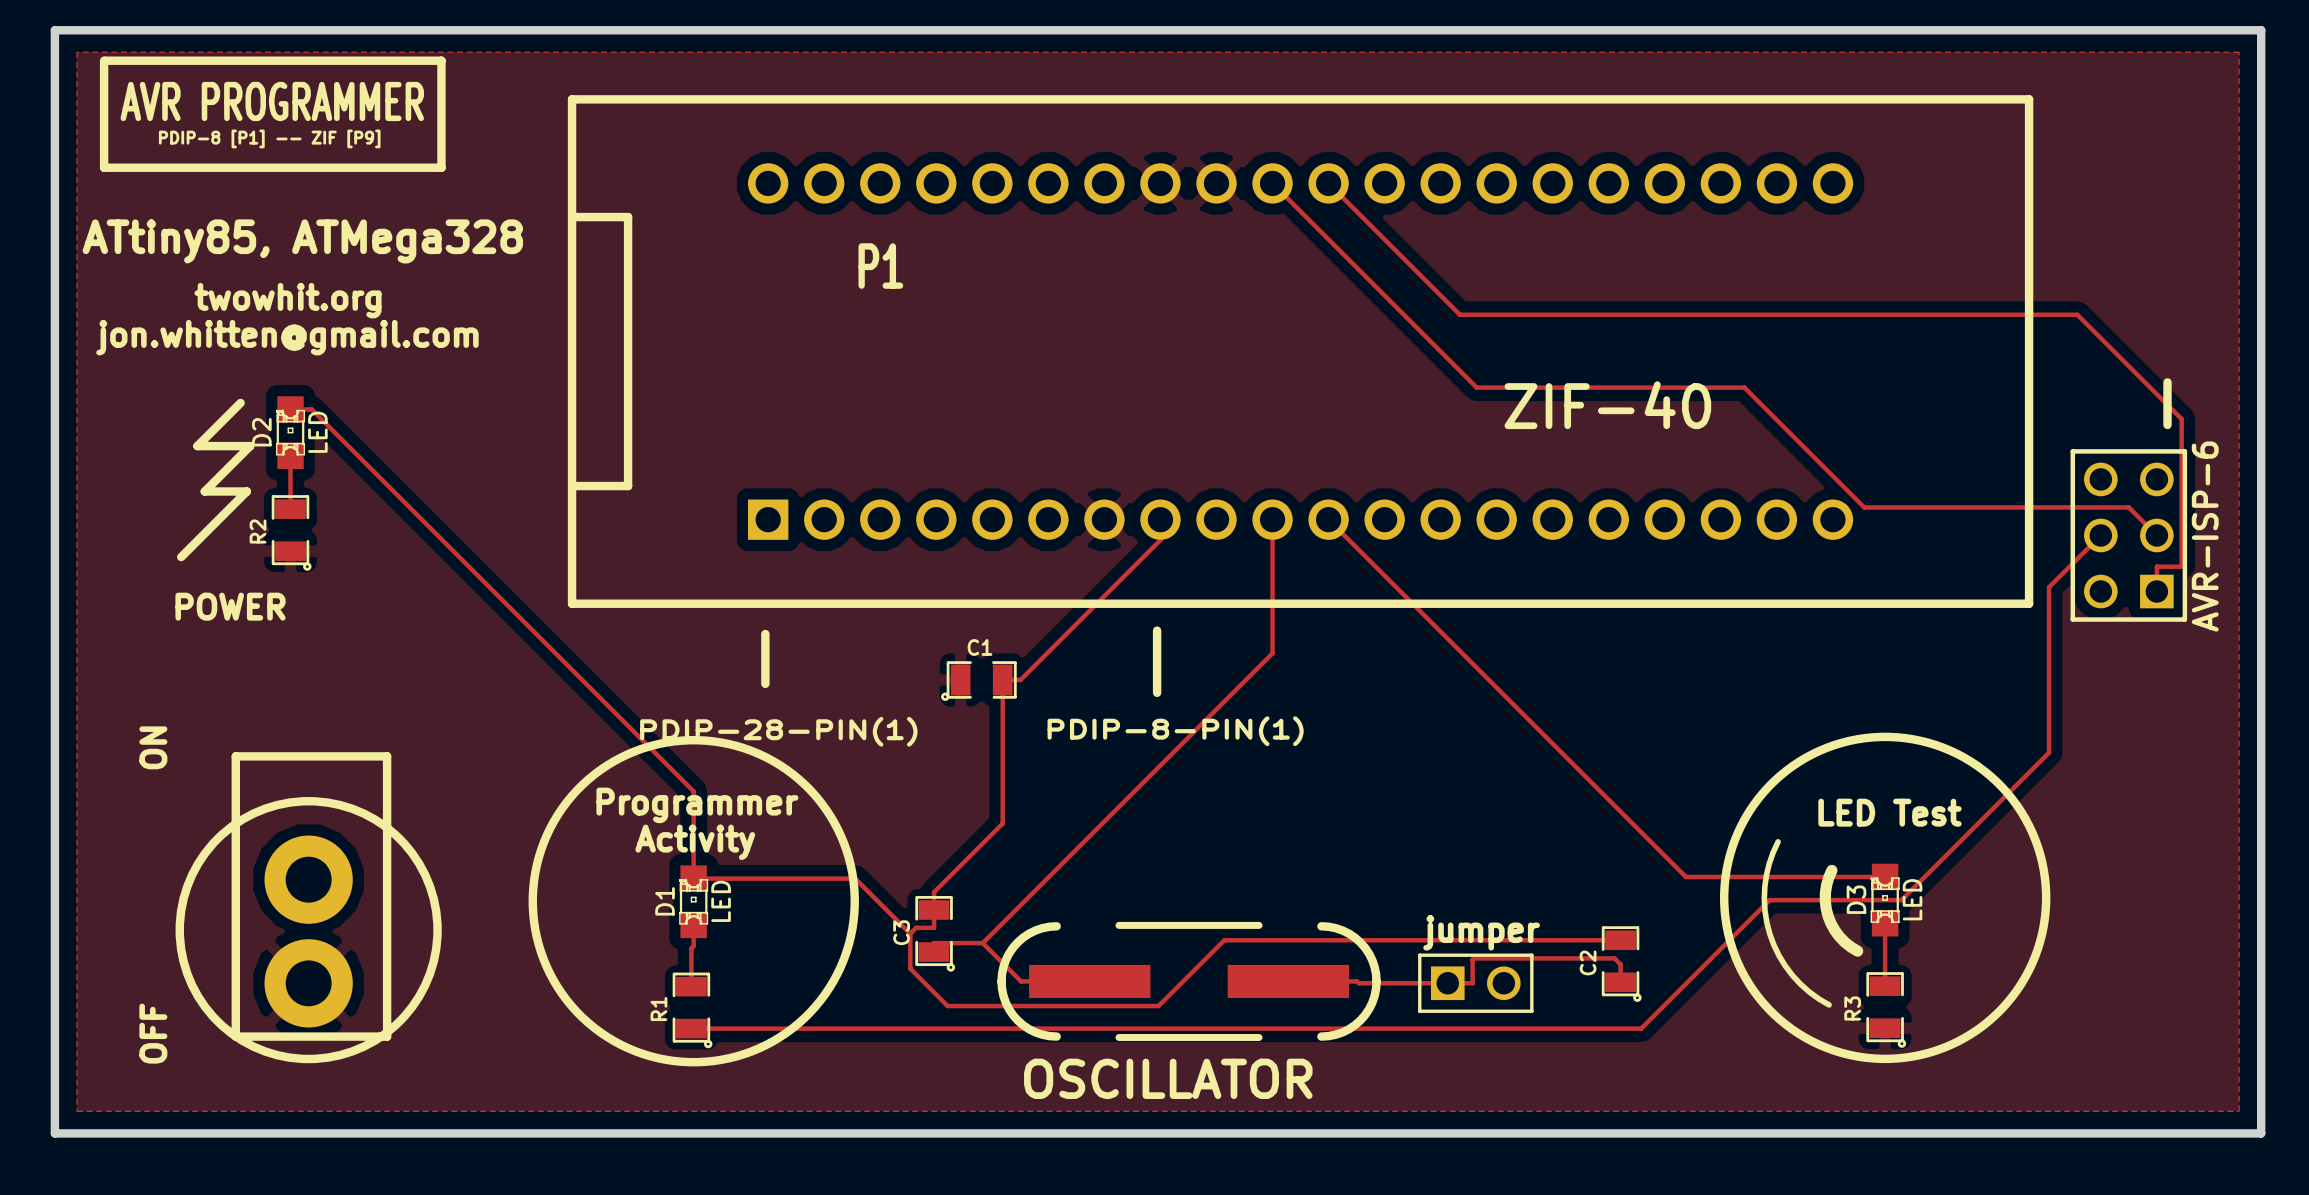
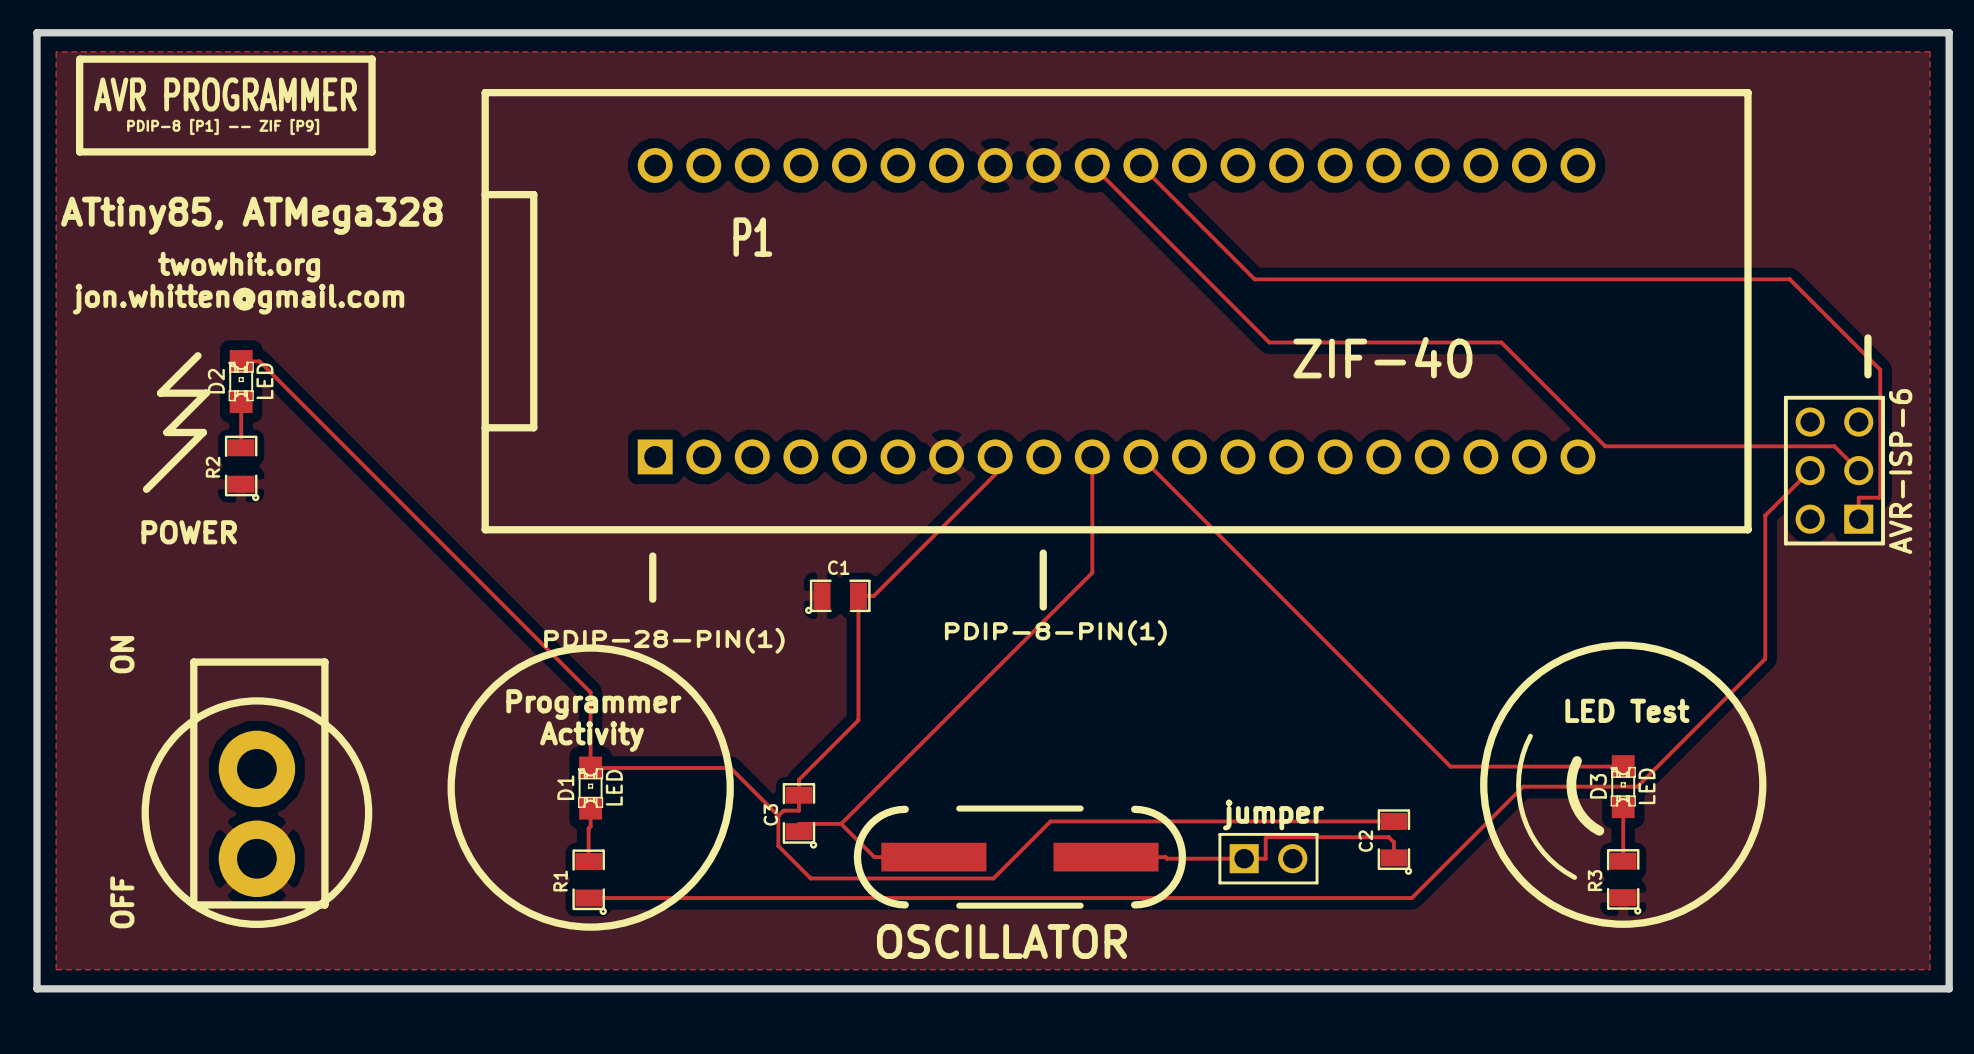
line: (1157, 630) (1157, 692) -> (1043, 553) (1043, 607)
text position: PDIP-8-PIN(1) (1175, 731) -> PDIP-8-PIN(1) (1055, 632)

